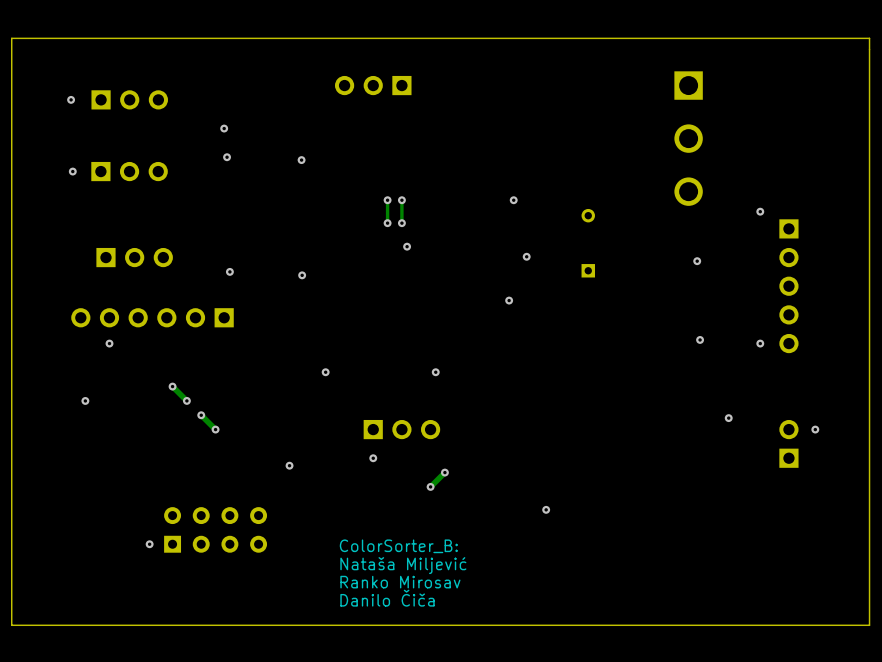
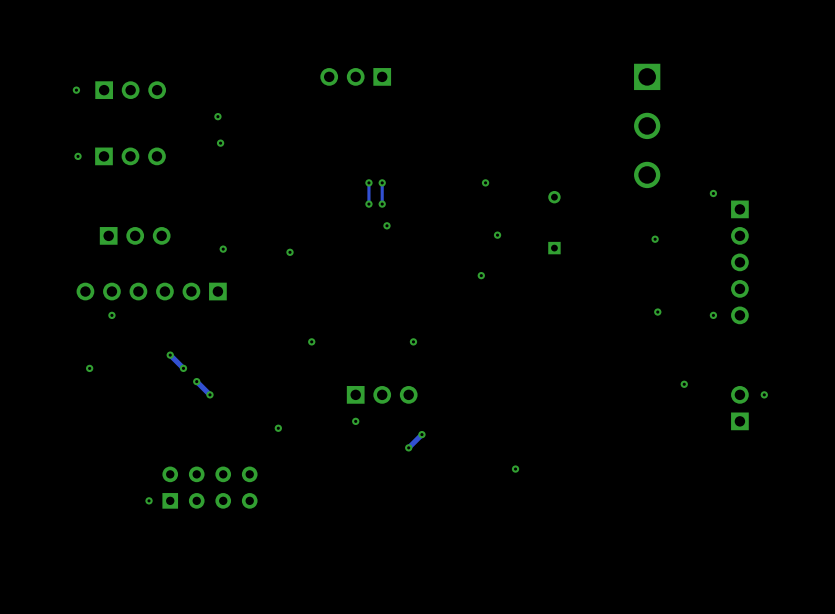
board edge: (869, 38) (869, 625) (11, 625) (11, 38) (869, 38) -> none
via: (301, 160) -> none
text: ColorSorter_B: (398, 546) -> none
text: Nataša Miljević (403, 565) -> none
text: Ranko Mirosav (400, 582) -> none
text: Danilo Čiča (387, 598) -> none

